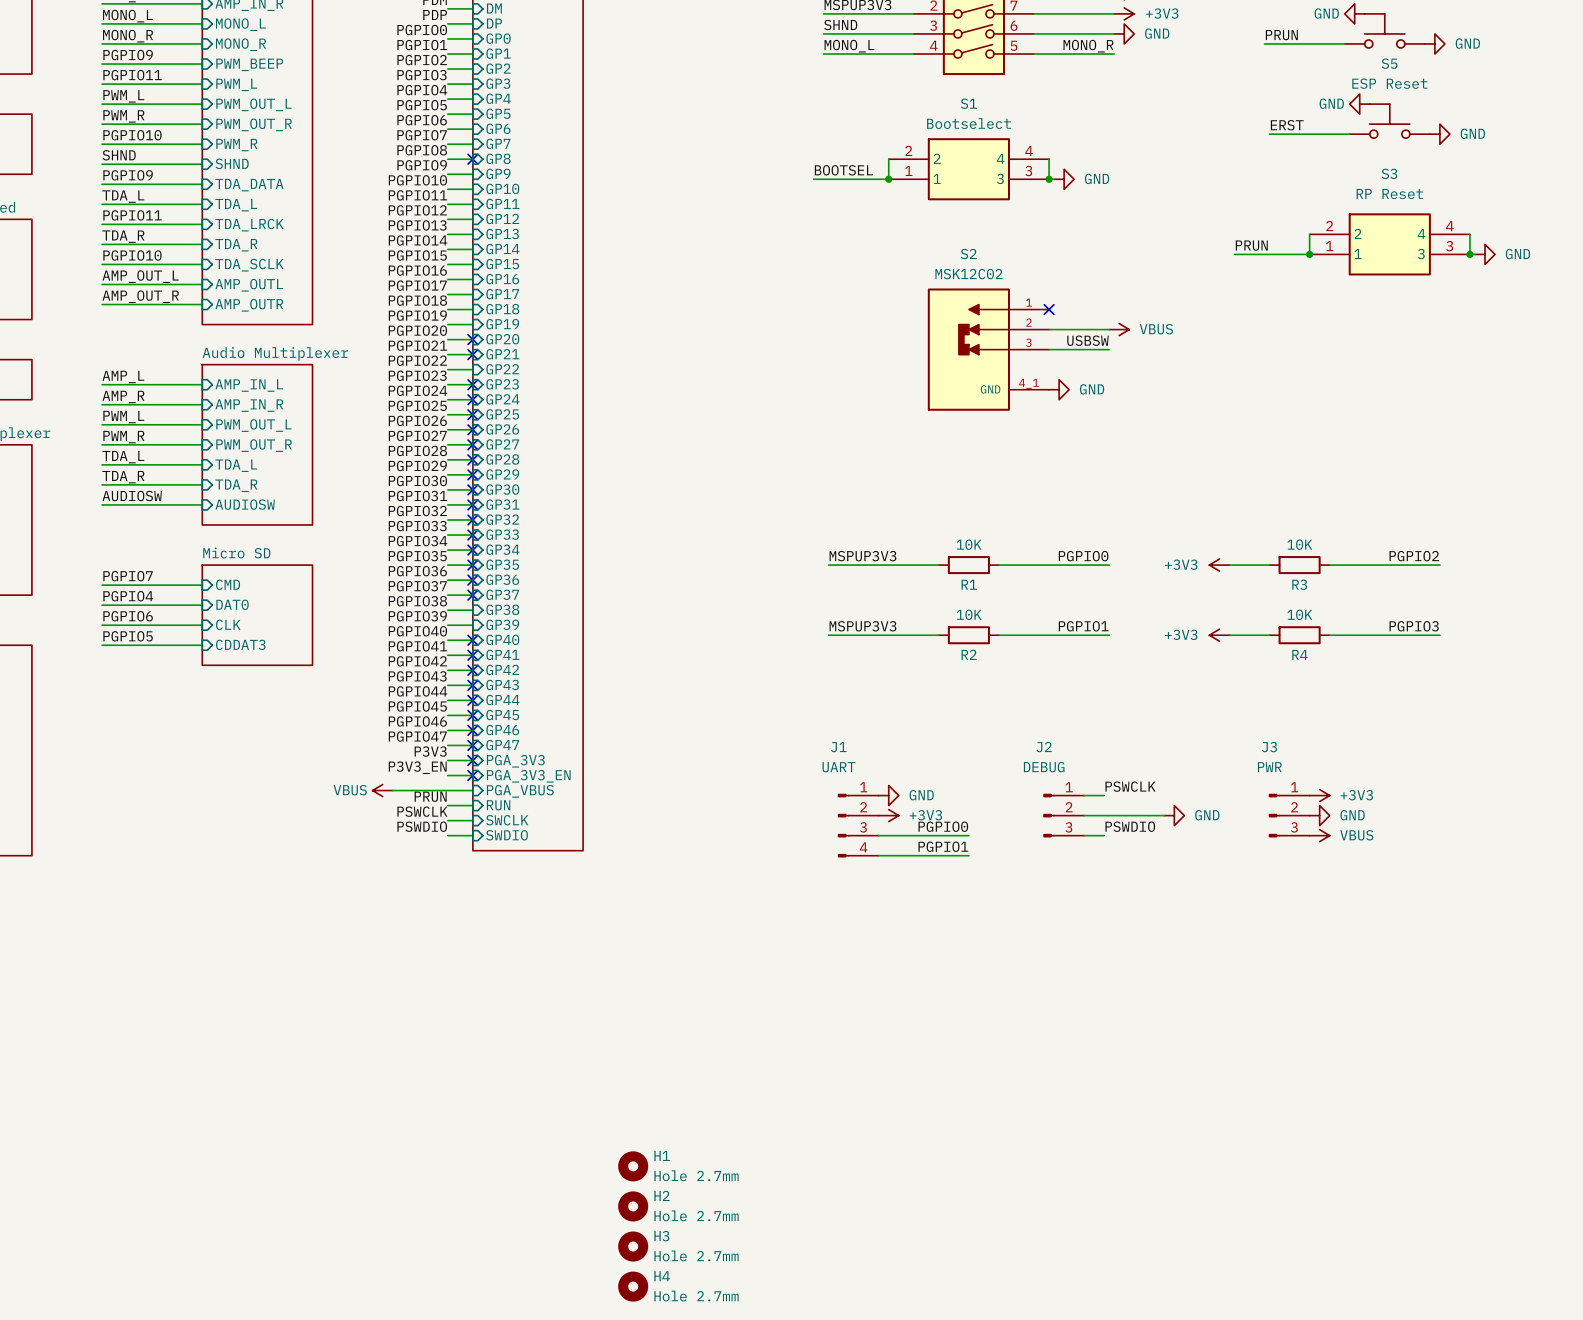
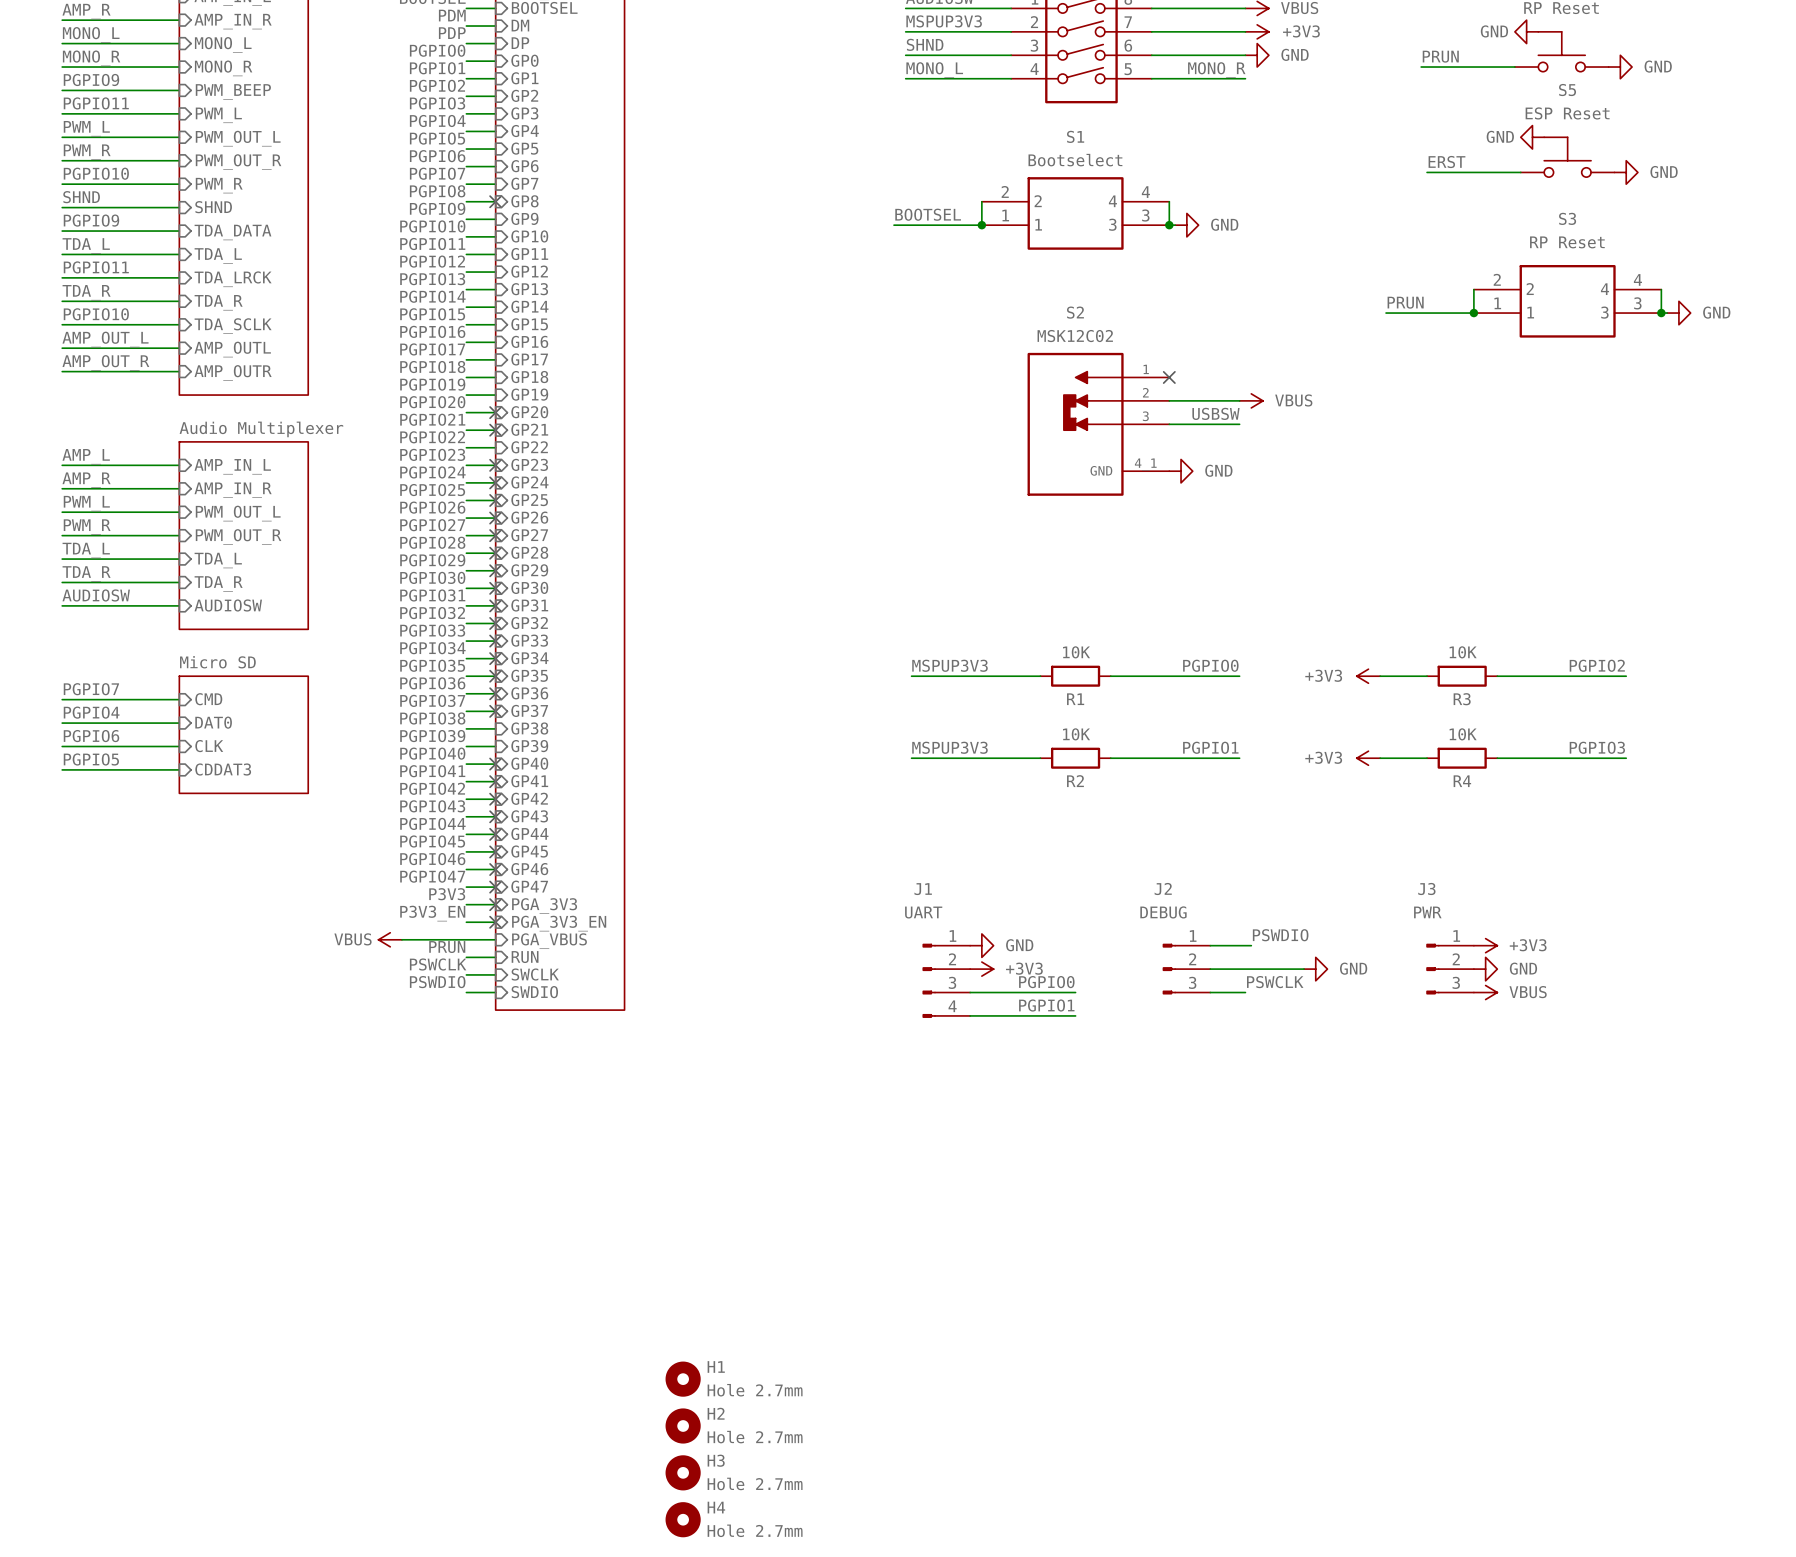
label position: PSWCLK (1130, 786) -> PSWCLK (1275, 982)
wire: none -> (1233, 945) (1251, 945)
label position: PSWDIO (1130, 826) -> PSWDIO (1280, 935)
wire: none -> (1233, 992) (1245, 992)

